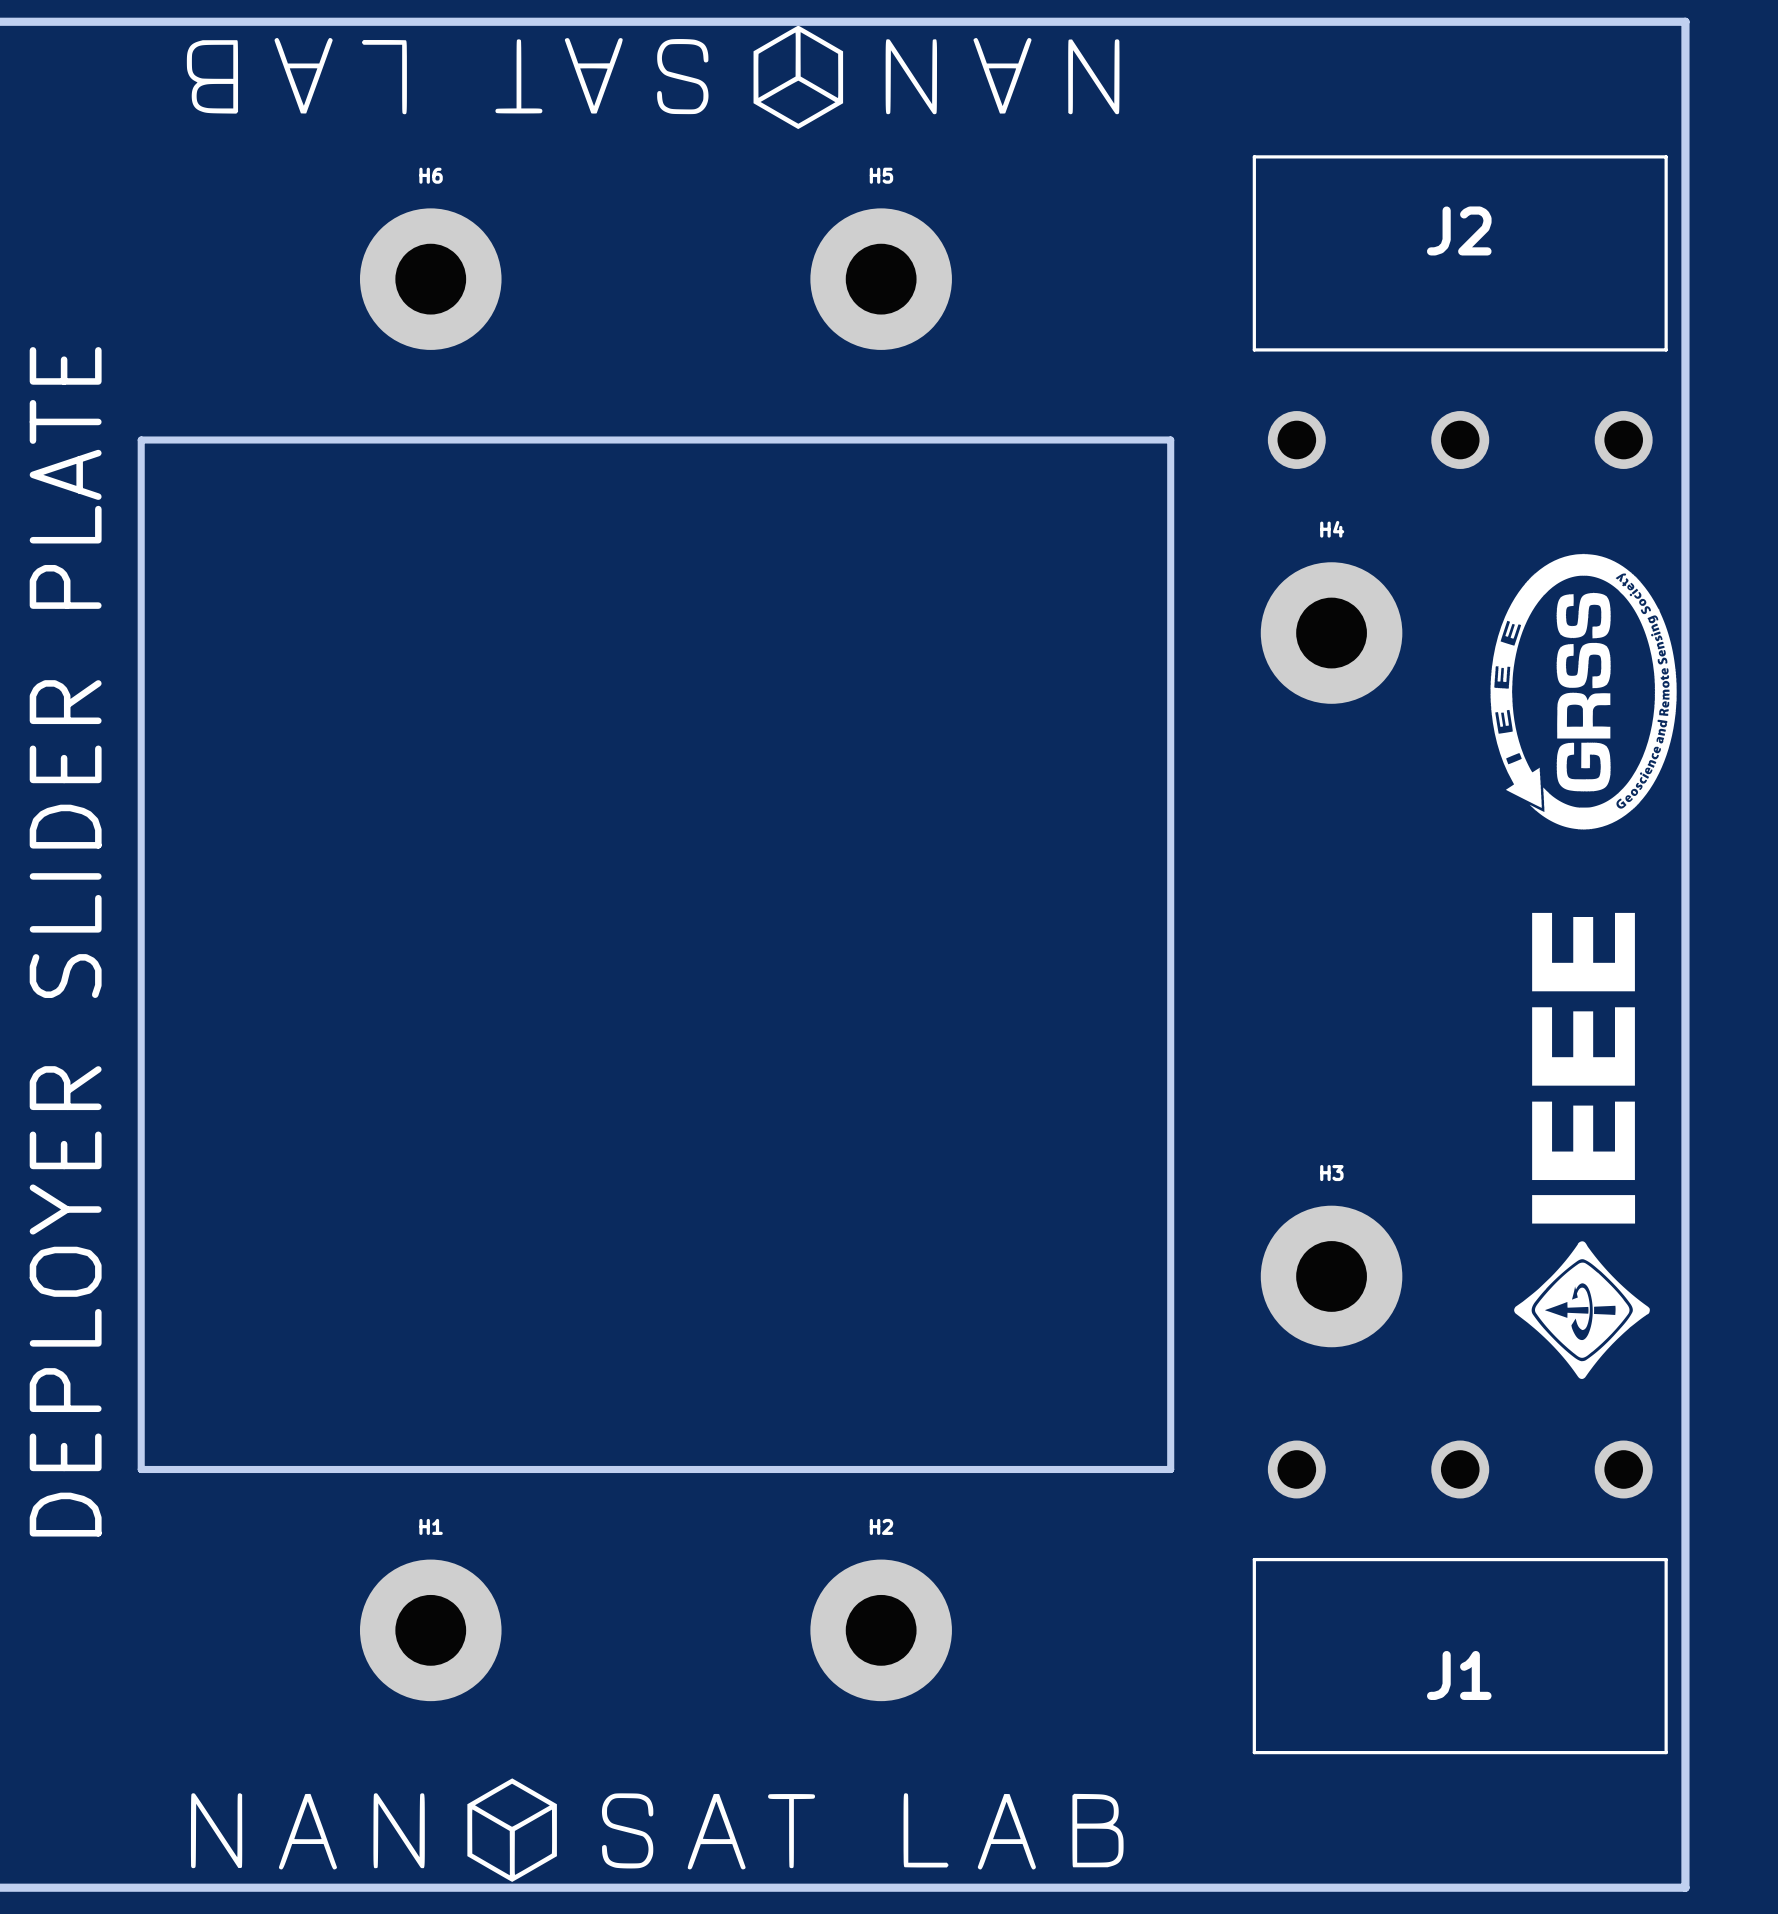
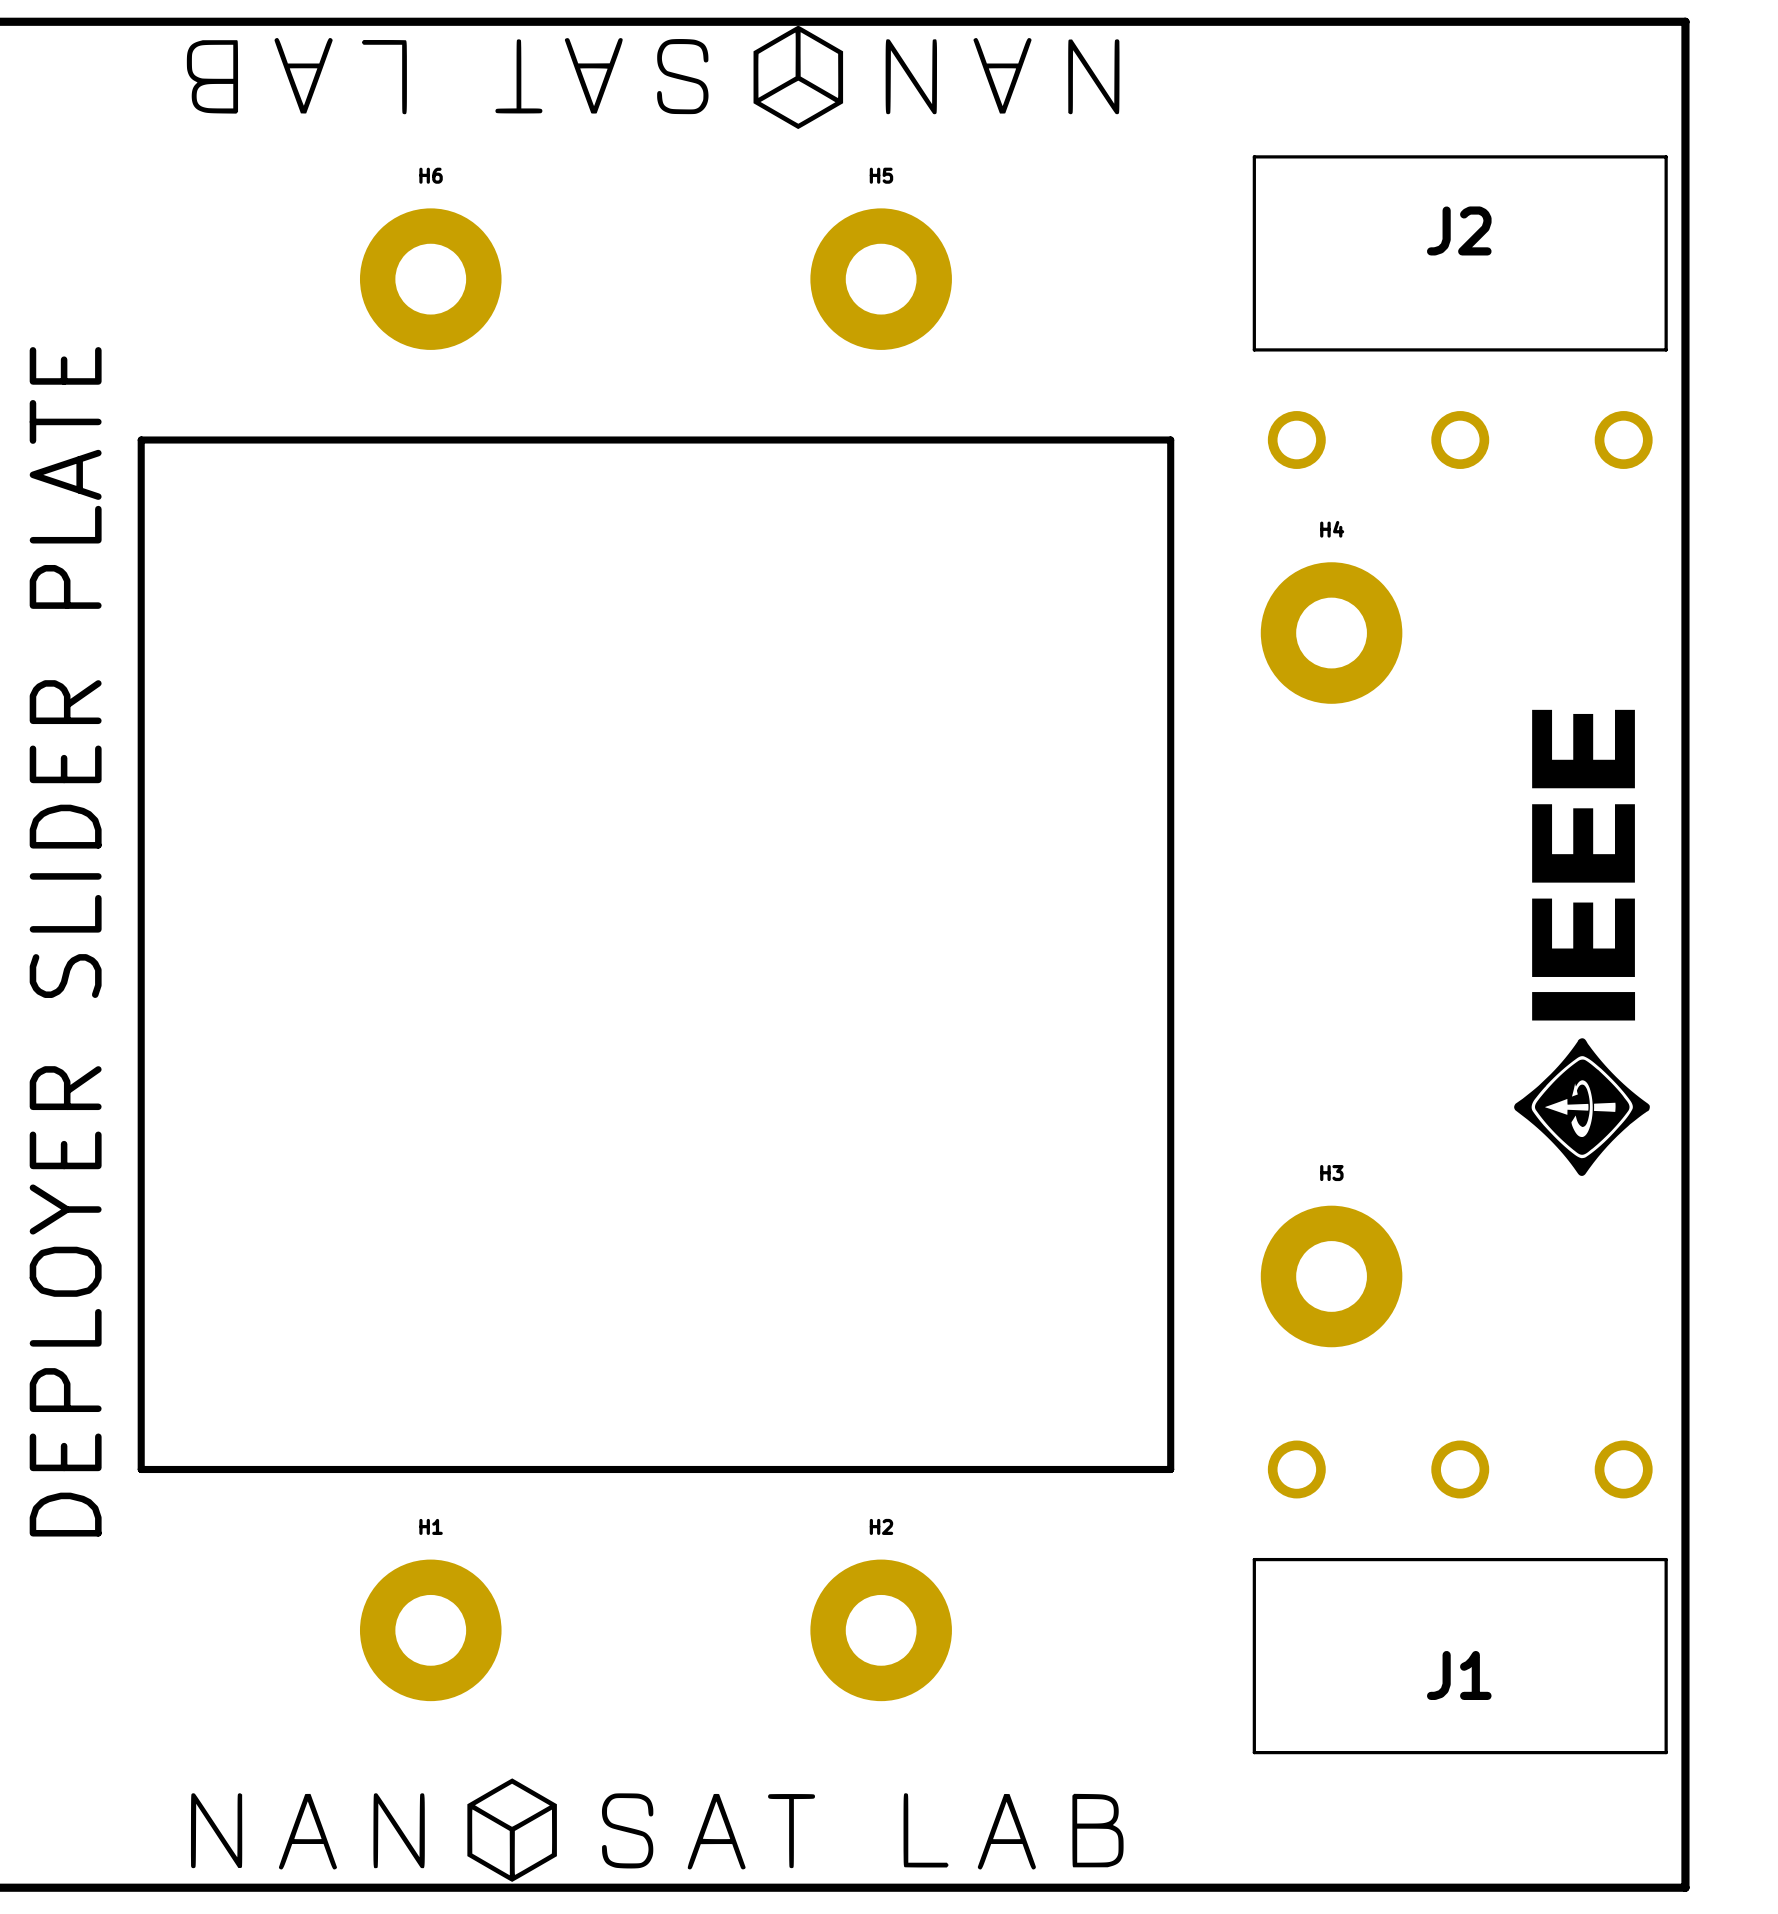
drawing: [1490, 553, 1677, 830] -> none
drawing position: (1581, 1145) -> (1581, 942)

